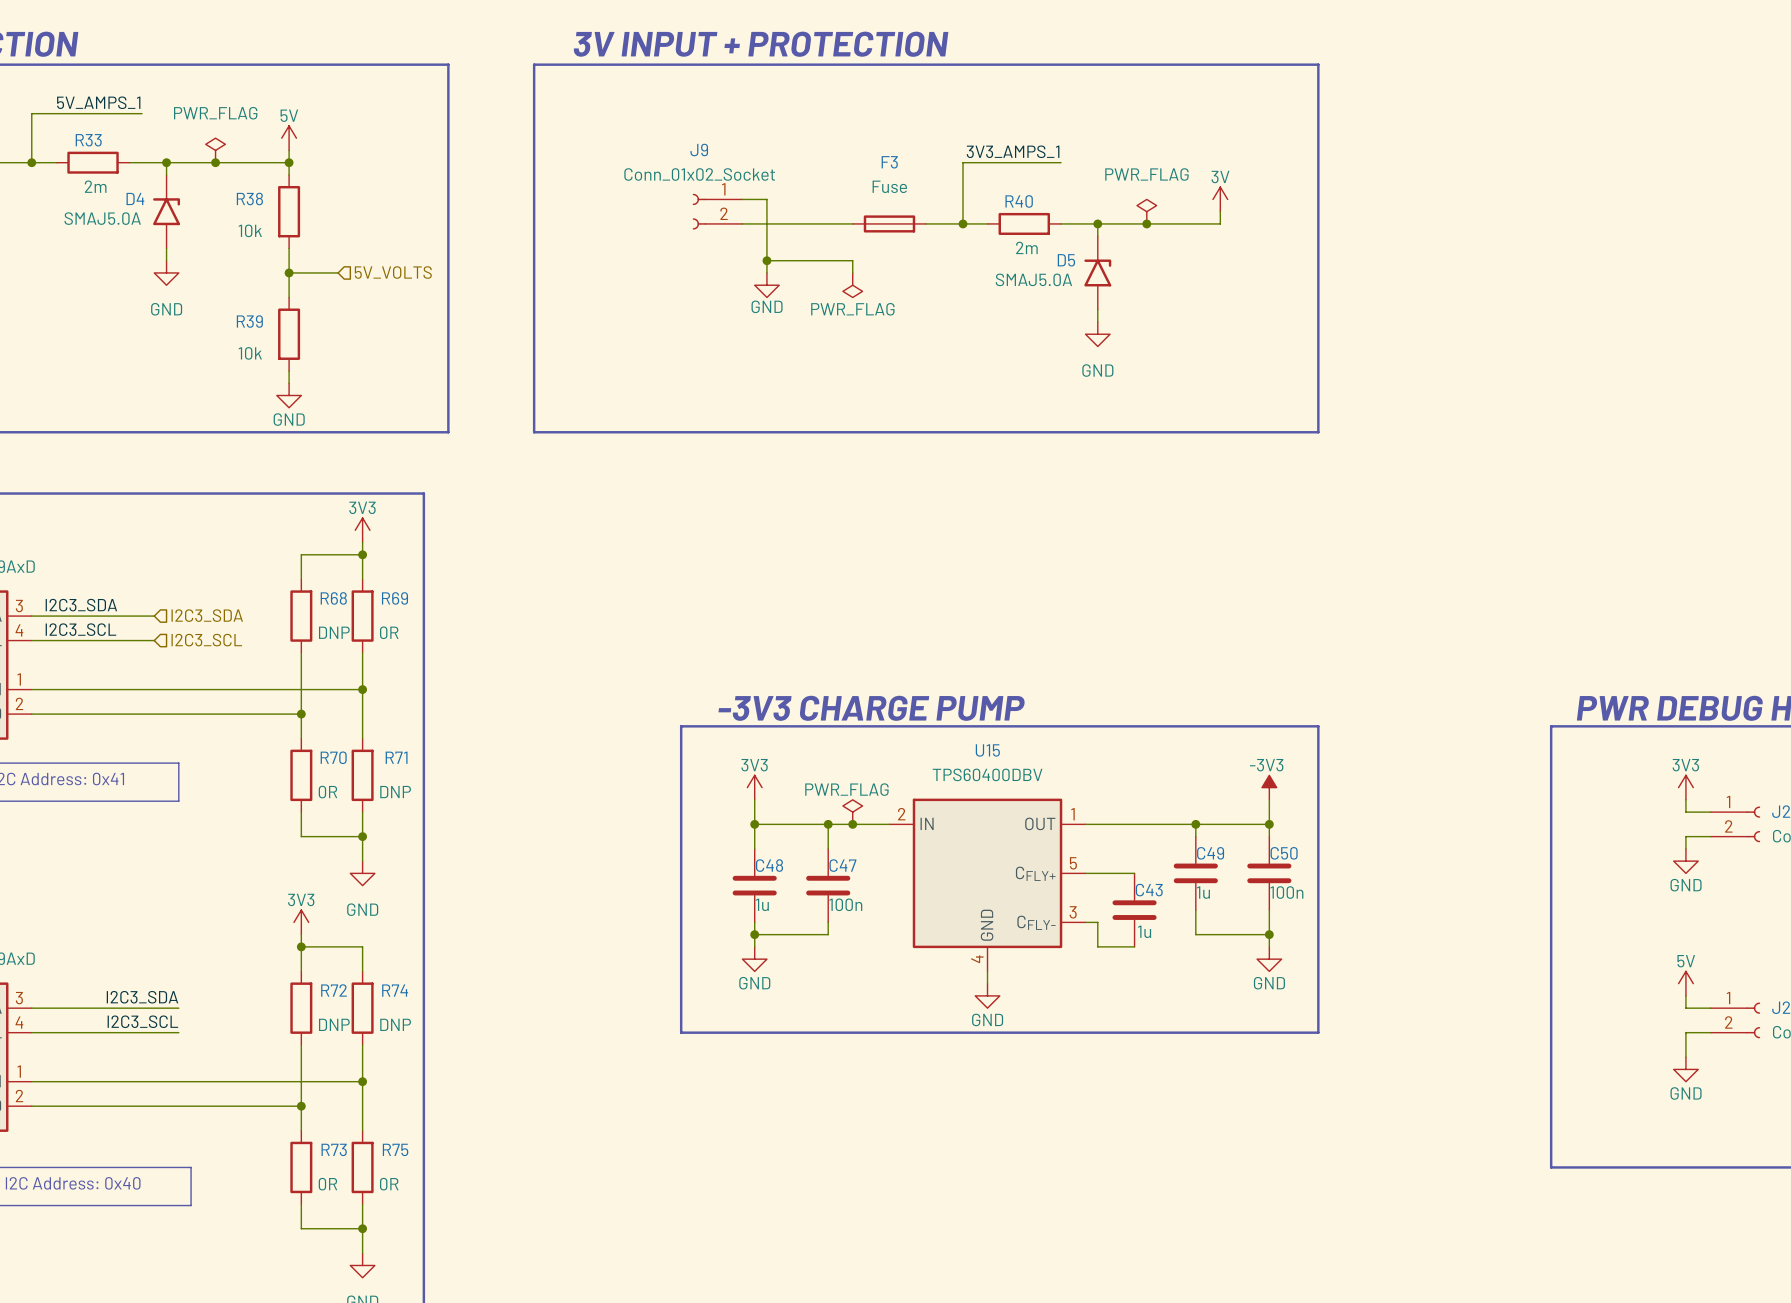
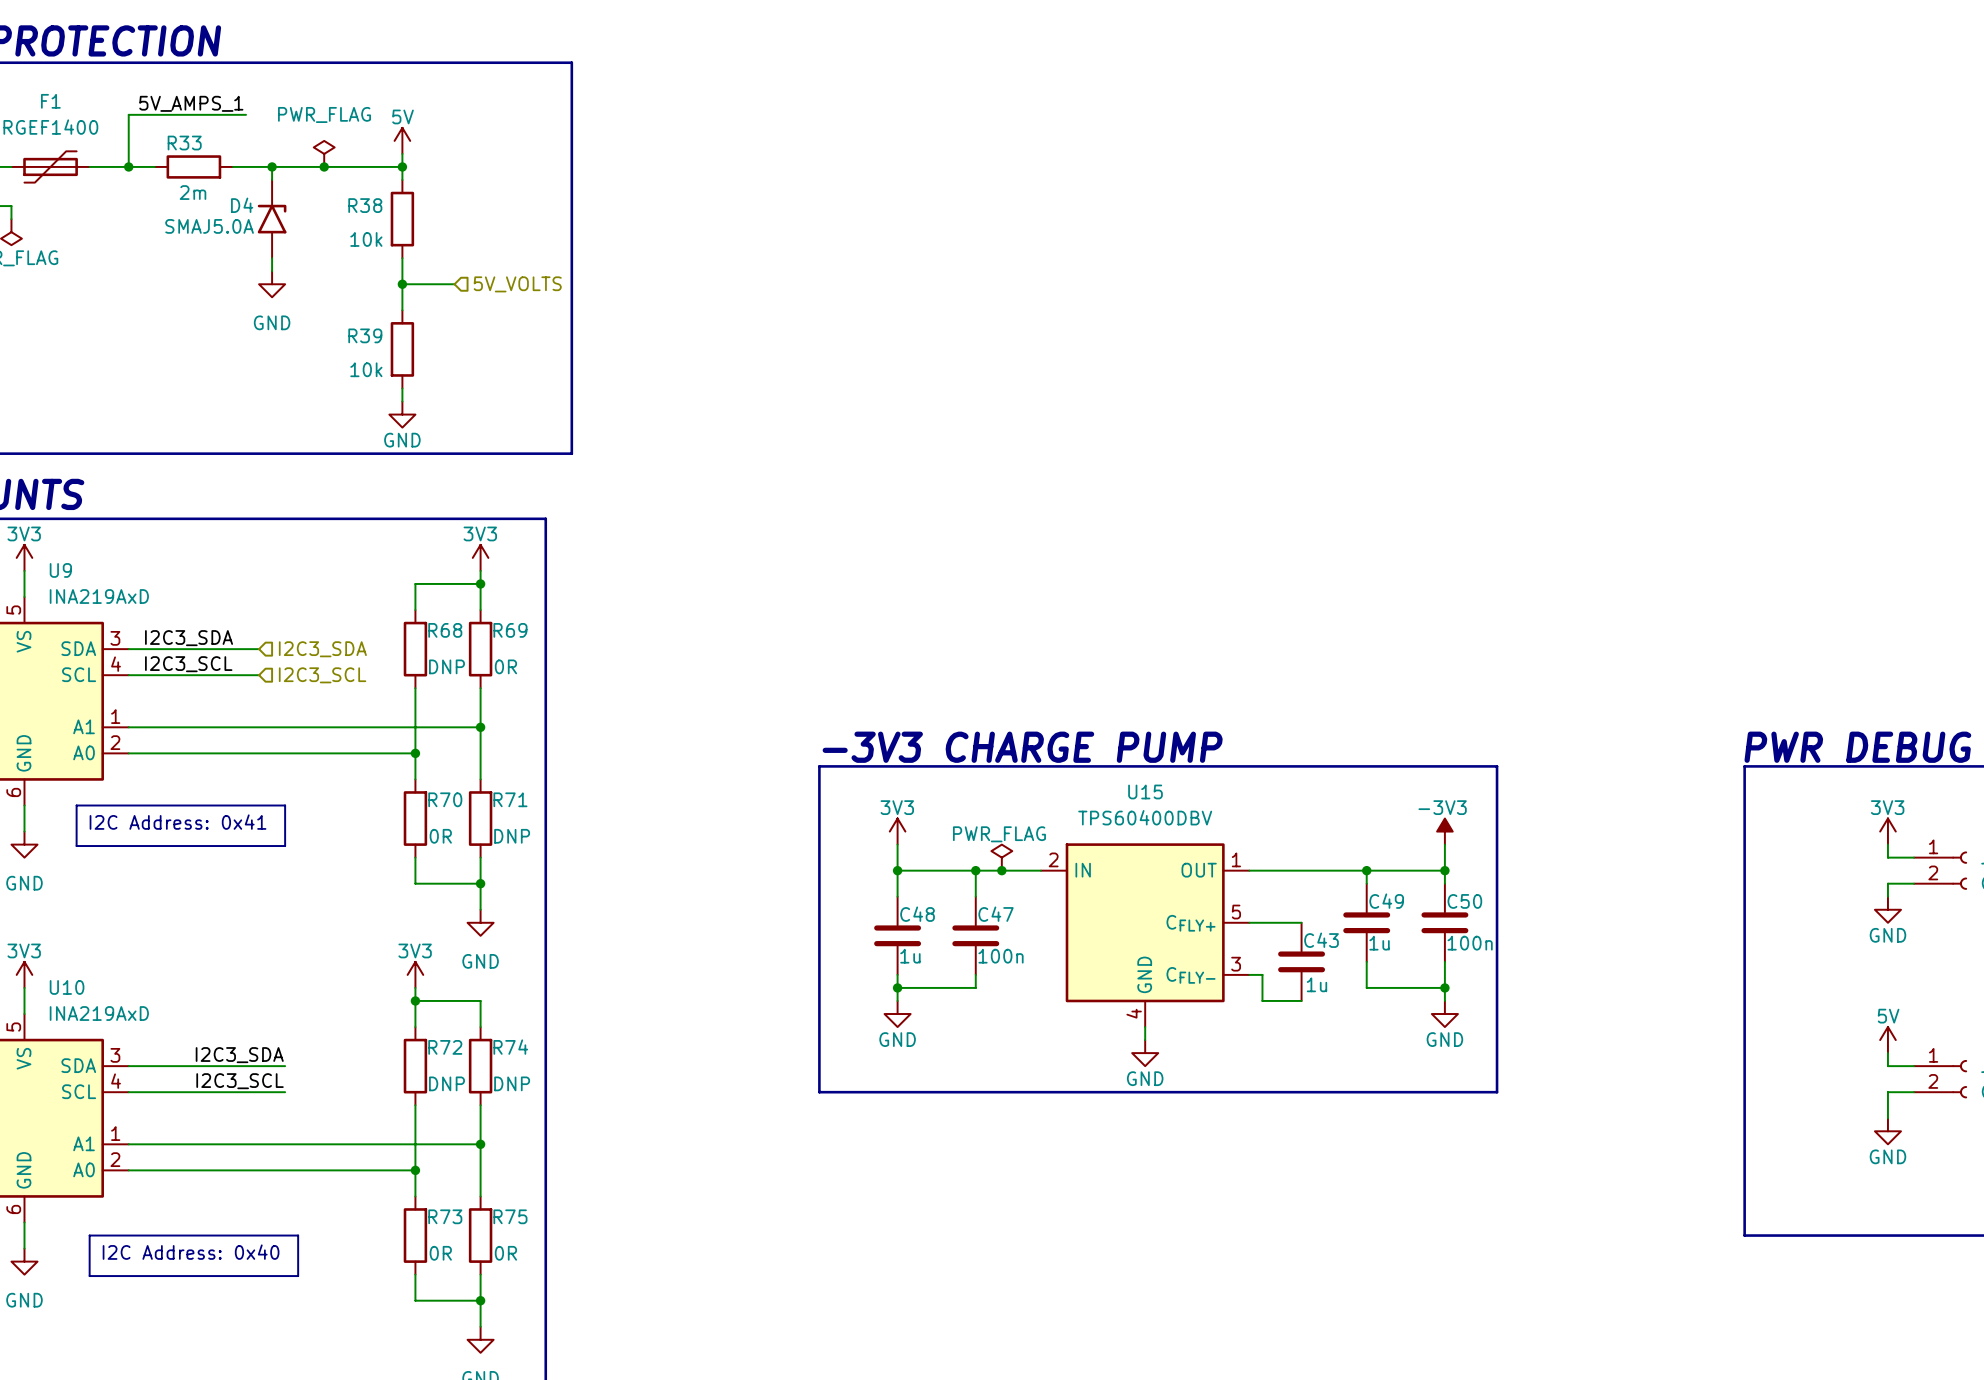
text: 3V INPUT + PROTECTION (761, 44) -> none
line: (534, 64) (1318, 64) (1318, 432) (534, 432) (534, 64) -> none
label: 3V3_AMPS_1 (1013, 151) -> none
wire: (1061, 162) (963, 162) (963, 223) -> none
wire: (742, 199) (766, 199) (766, 272) -> none
power symbol: 3V (1220, 199) -> none
J9: Conn_01x02_Socket (717, 211) -> none
power symbol: PWR_FLAG (1146, 211) -> none
wire: (1220, 211) (1220, 223) (1061, 223) -> none
wire: (742, 223) (852, 223) -> none
F3: Fuse (889, 223) -> none
wire: (926, 223) (987, 223) -> none
junction: (963, 223) -> none
R40: 2m (1024, 223) -> none
wire: (1097, 223) (1097, 236) -> none
junction: (1097, 223) -> none
junction: (1146, 223) -> none
wire: (766, 260) (852, 260) (852, 272) -> none
junction: (766, 260) -> none
D5: SMAJ5.0A (1097, 272) -> none
power symbol: GND (766, 285) -> none
power symbol: PWR_FLAG (852, 285) -> none
wire: (1097, 309) (1097, 321) -> none
power symbol: GND (1097, 334) -> none

